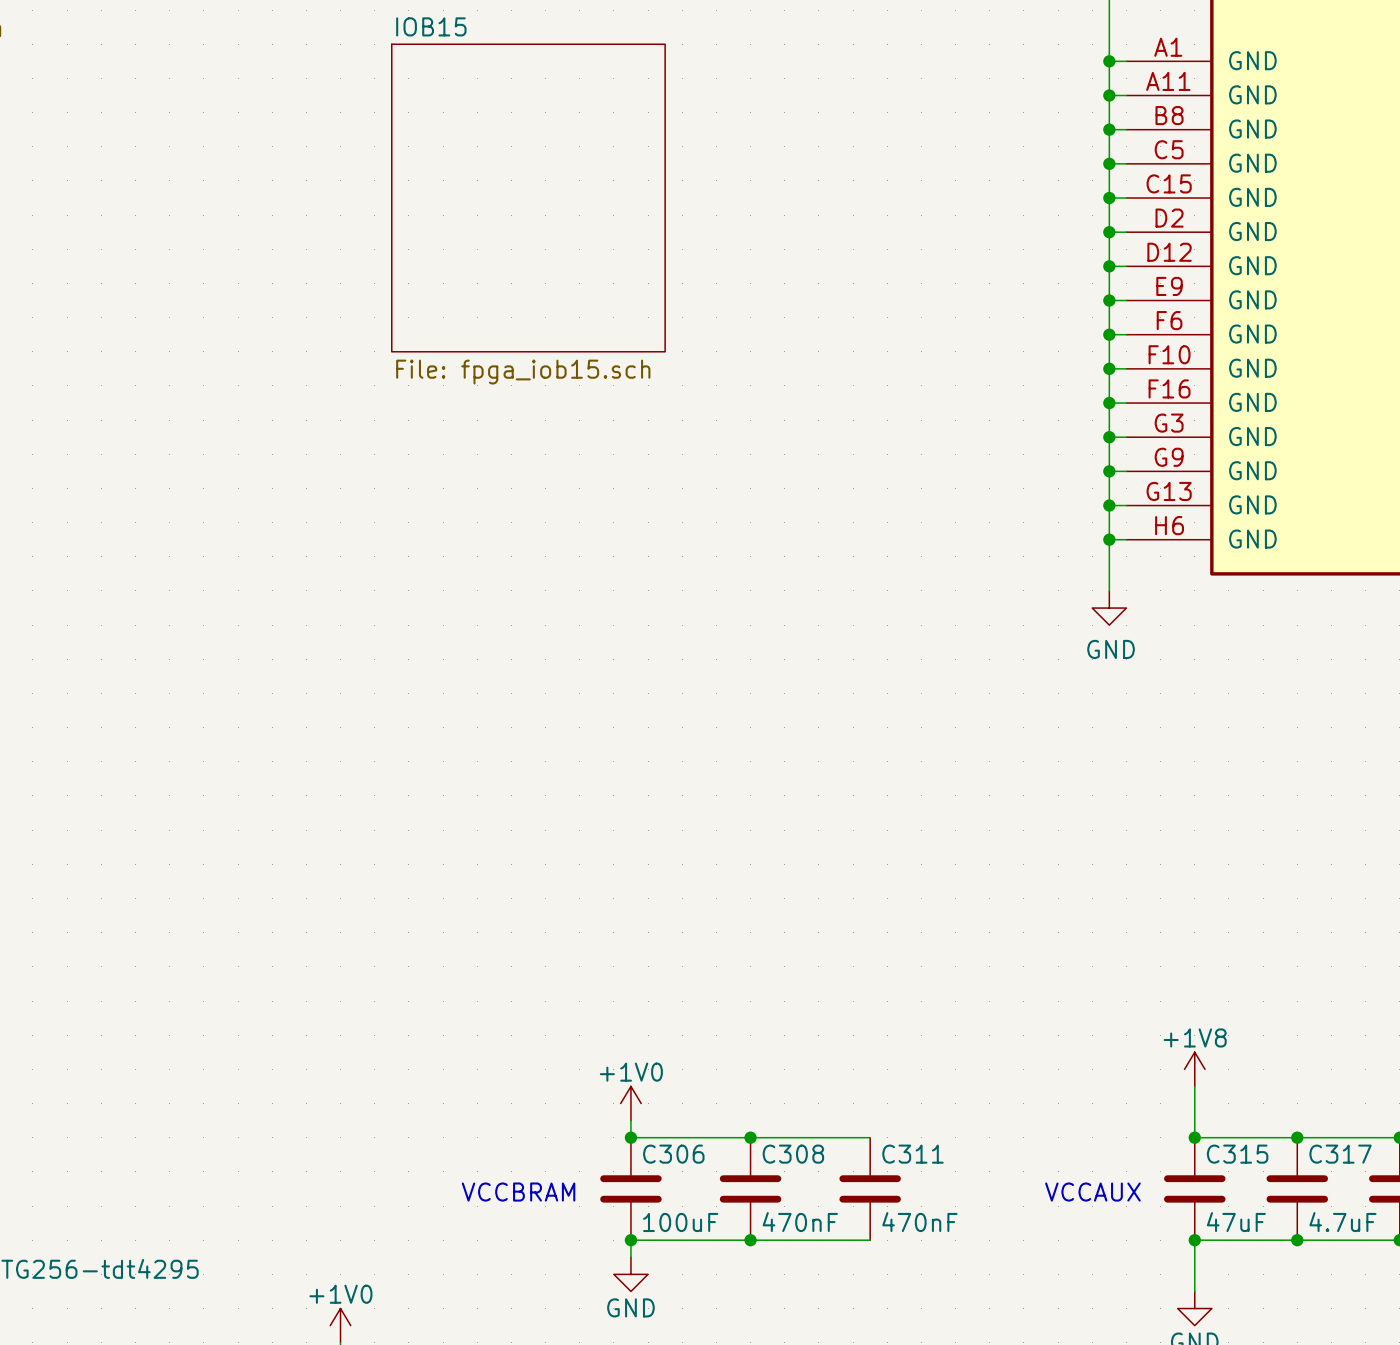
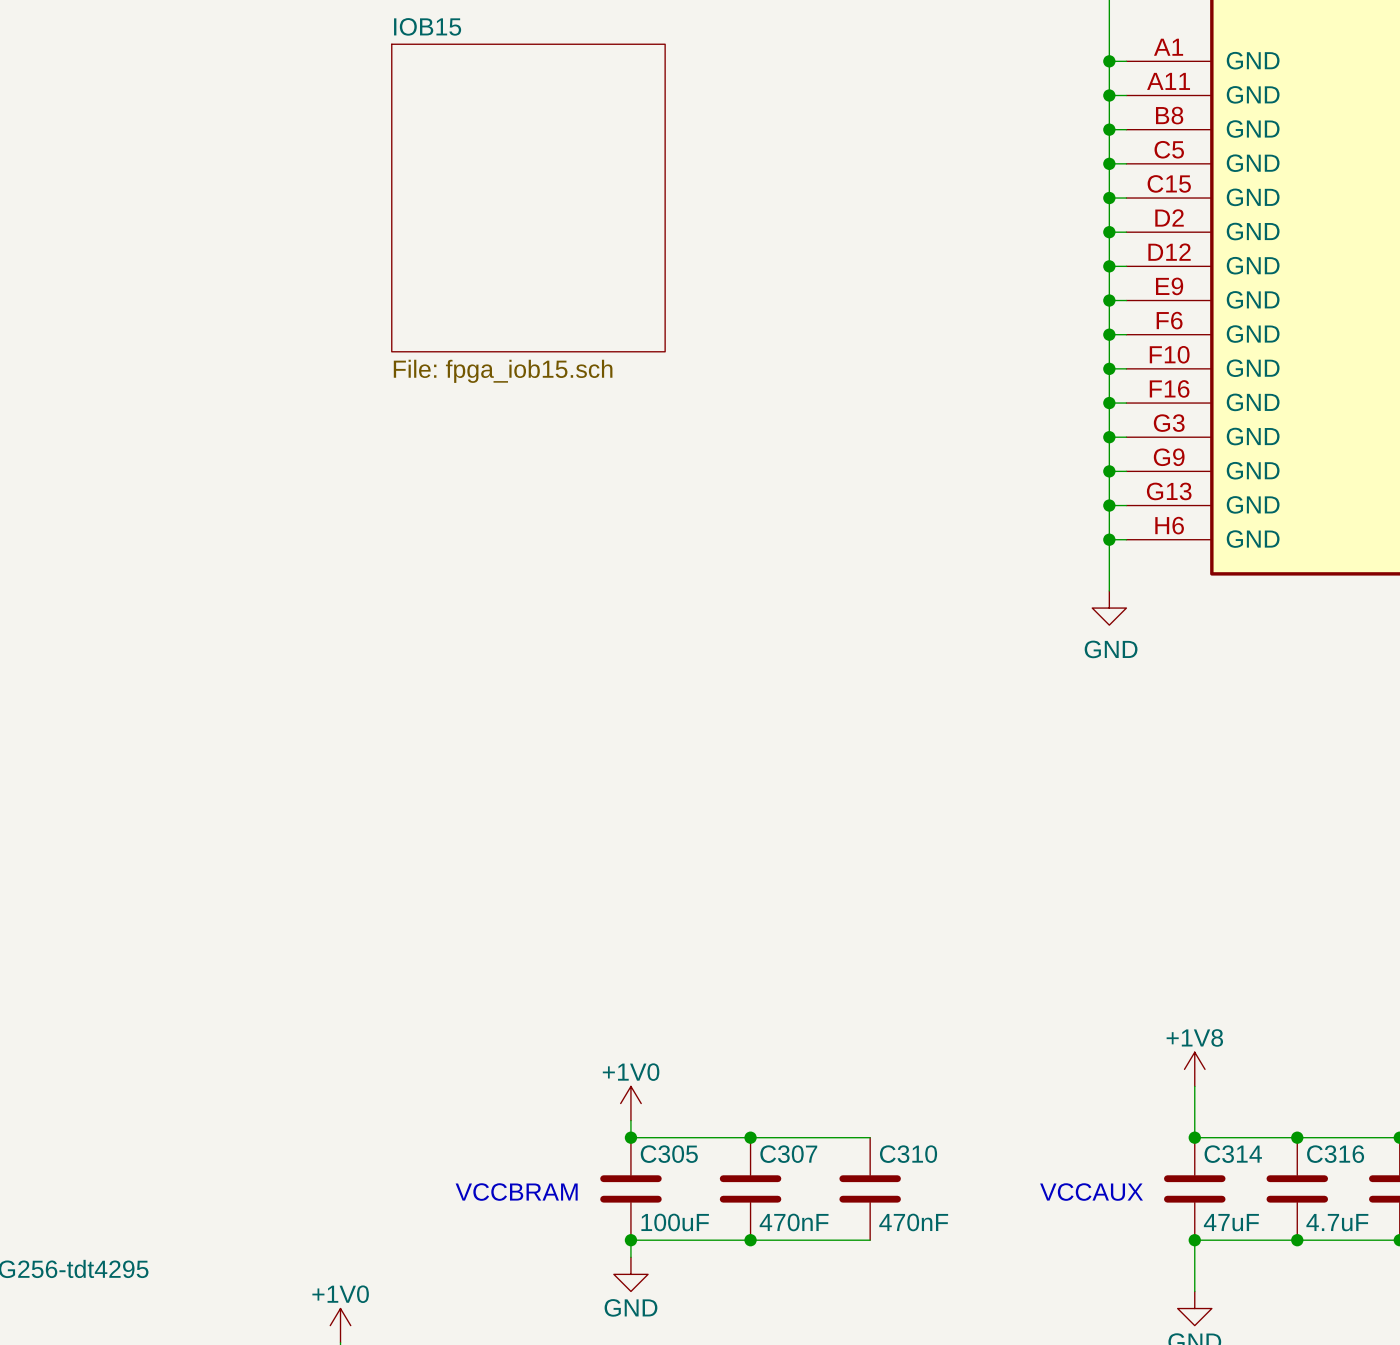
C306 name: C306 (673, 1154) -> C305 (669, 1154)
C308 name: C308 (793, 1154) -> C307 (788, 1154)
C311 name: C311 (912, 1154) -> C310 (908, 1154)
C315 name: C315 (1237, 1154) -> C314 (1233, 1154)
C317 name: C317 (1340, 1154) -> C316 (1335, 1154)

